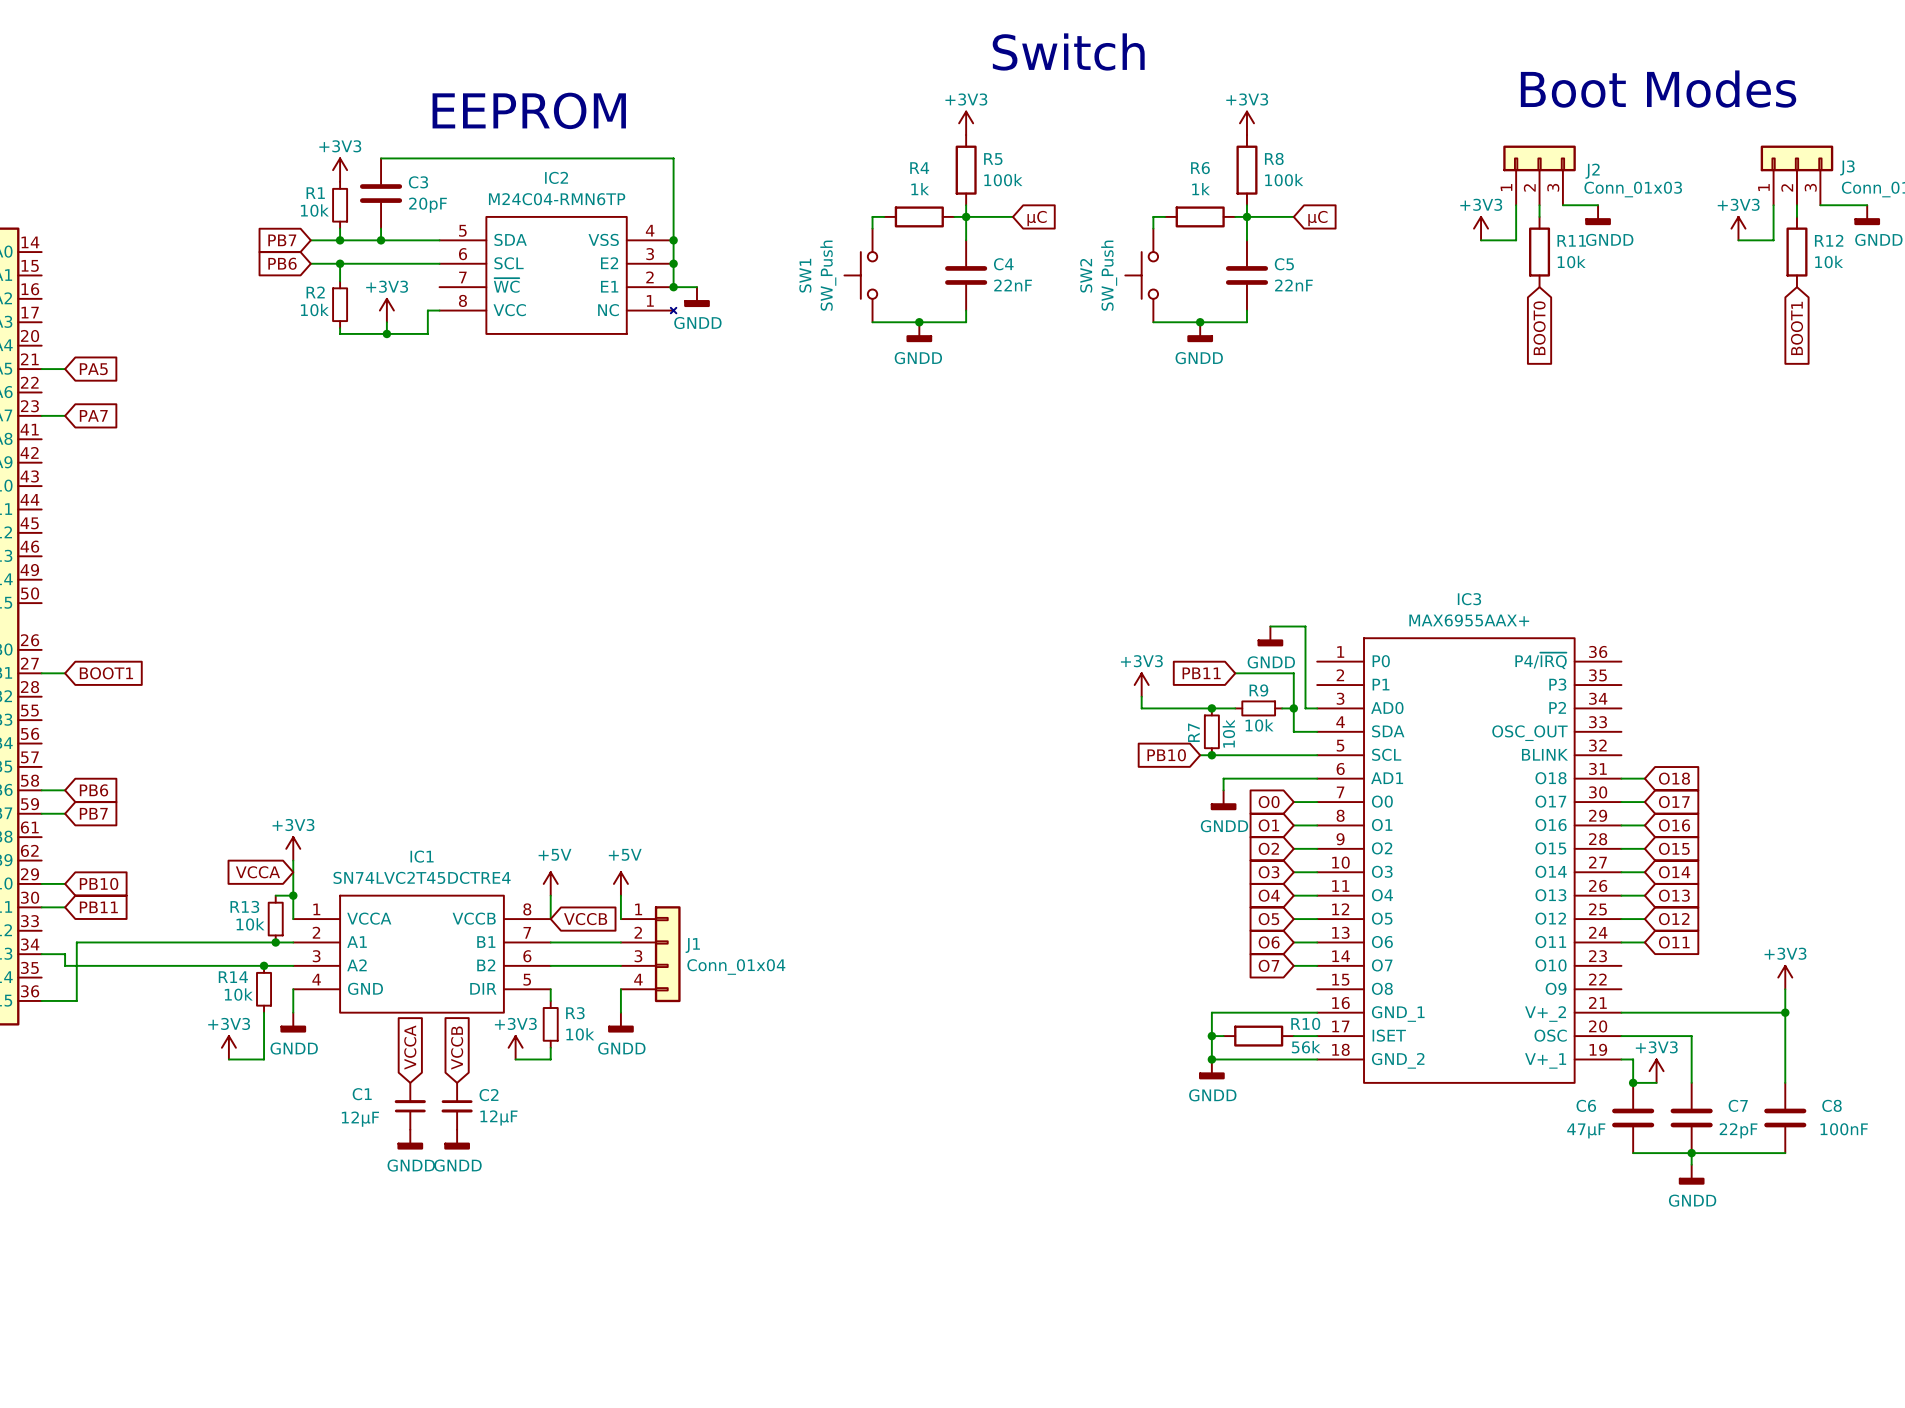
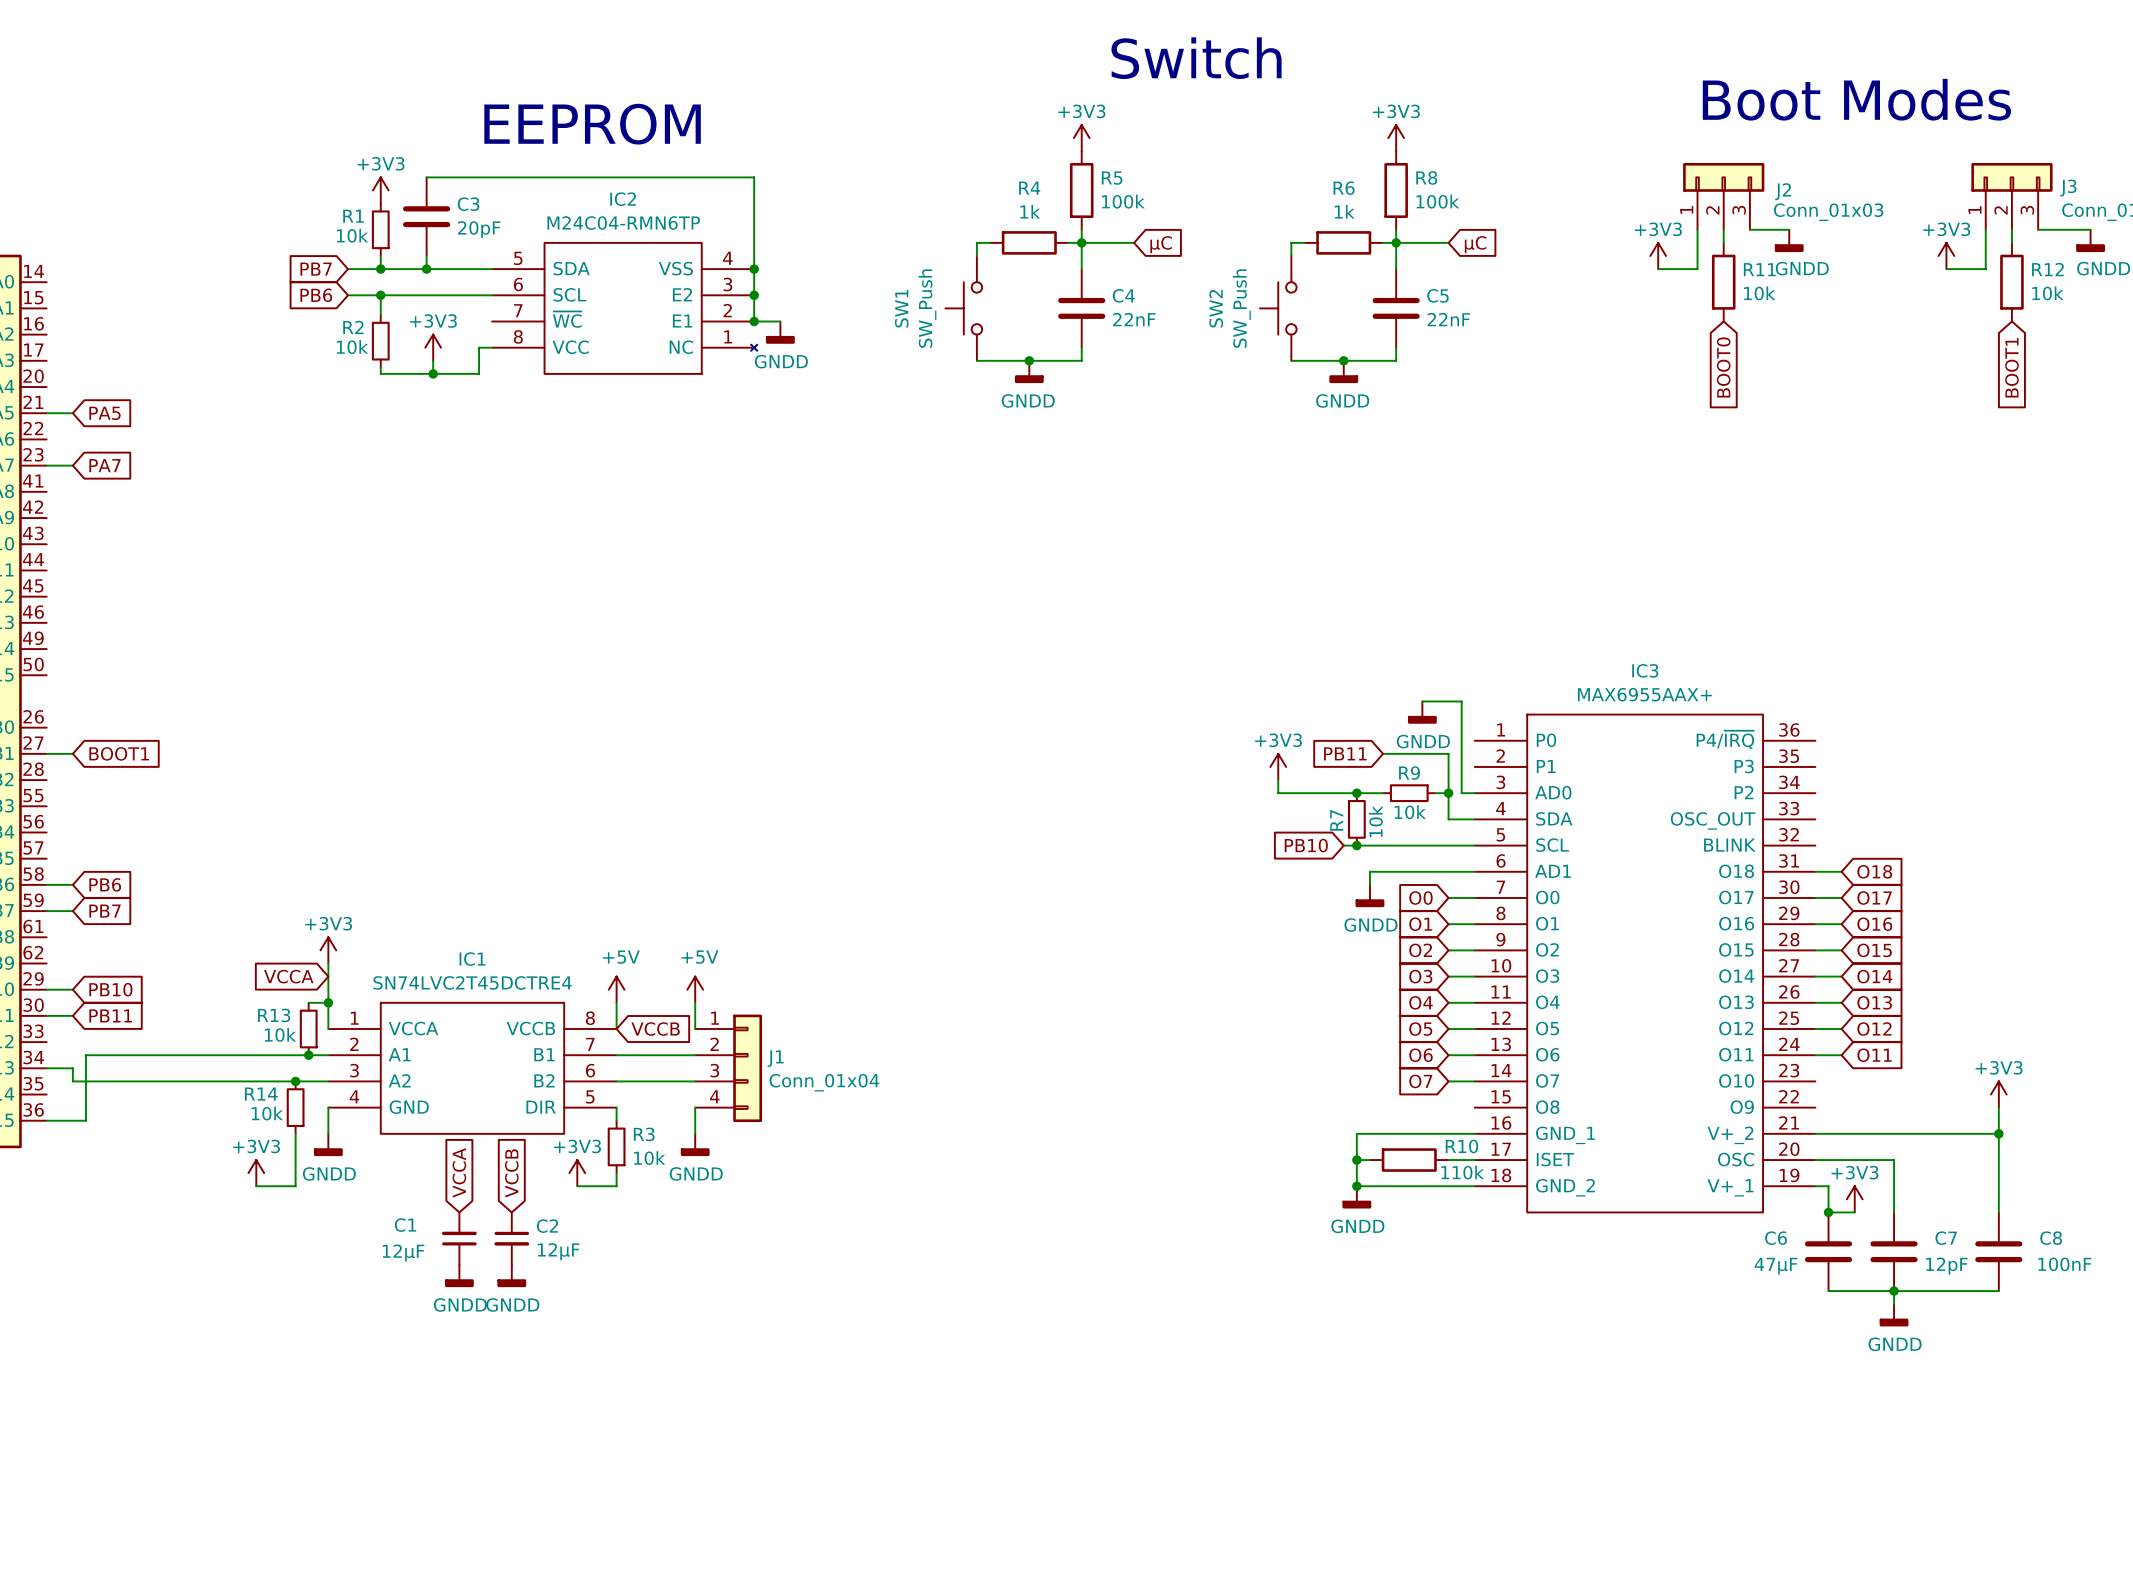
R10 value: 56k (1306, 1047) -> 110k (1462, 1172)
C7 value: 22pF (1738, 1130) -> 12pF (1946, 1266)

